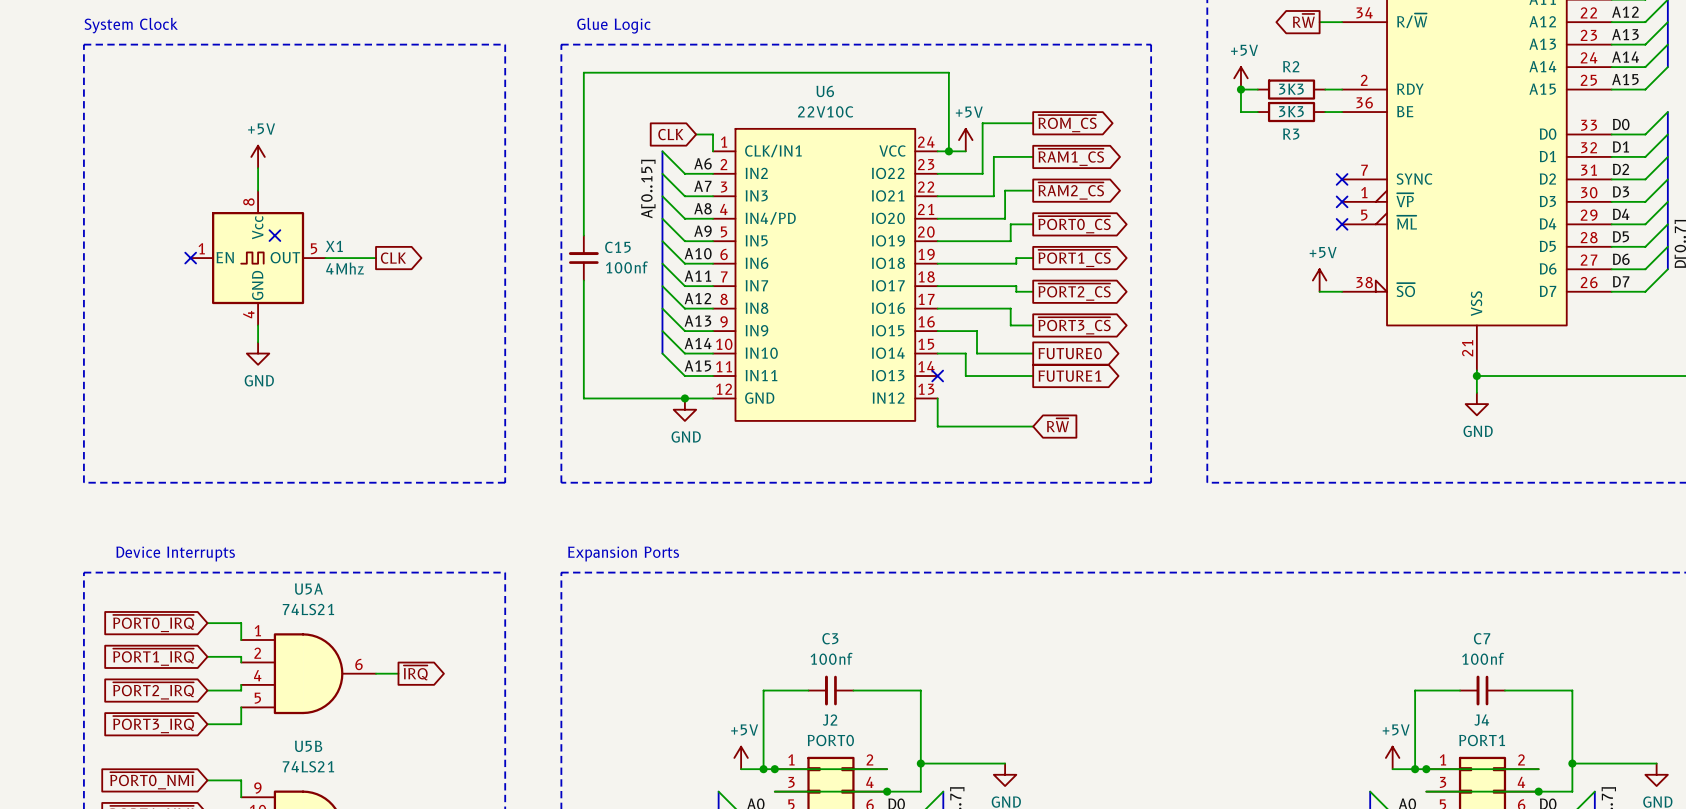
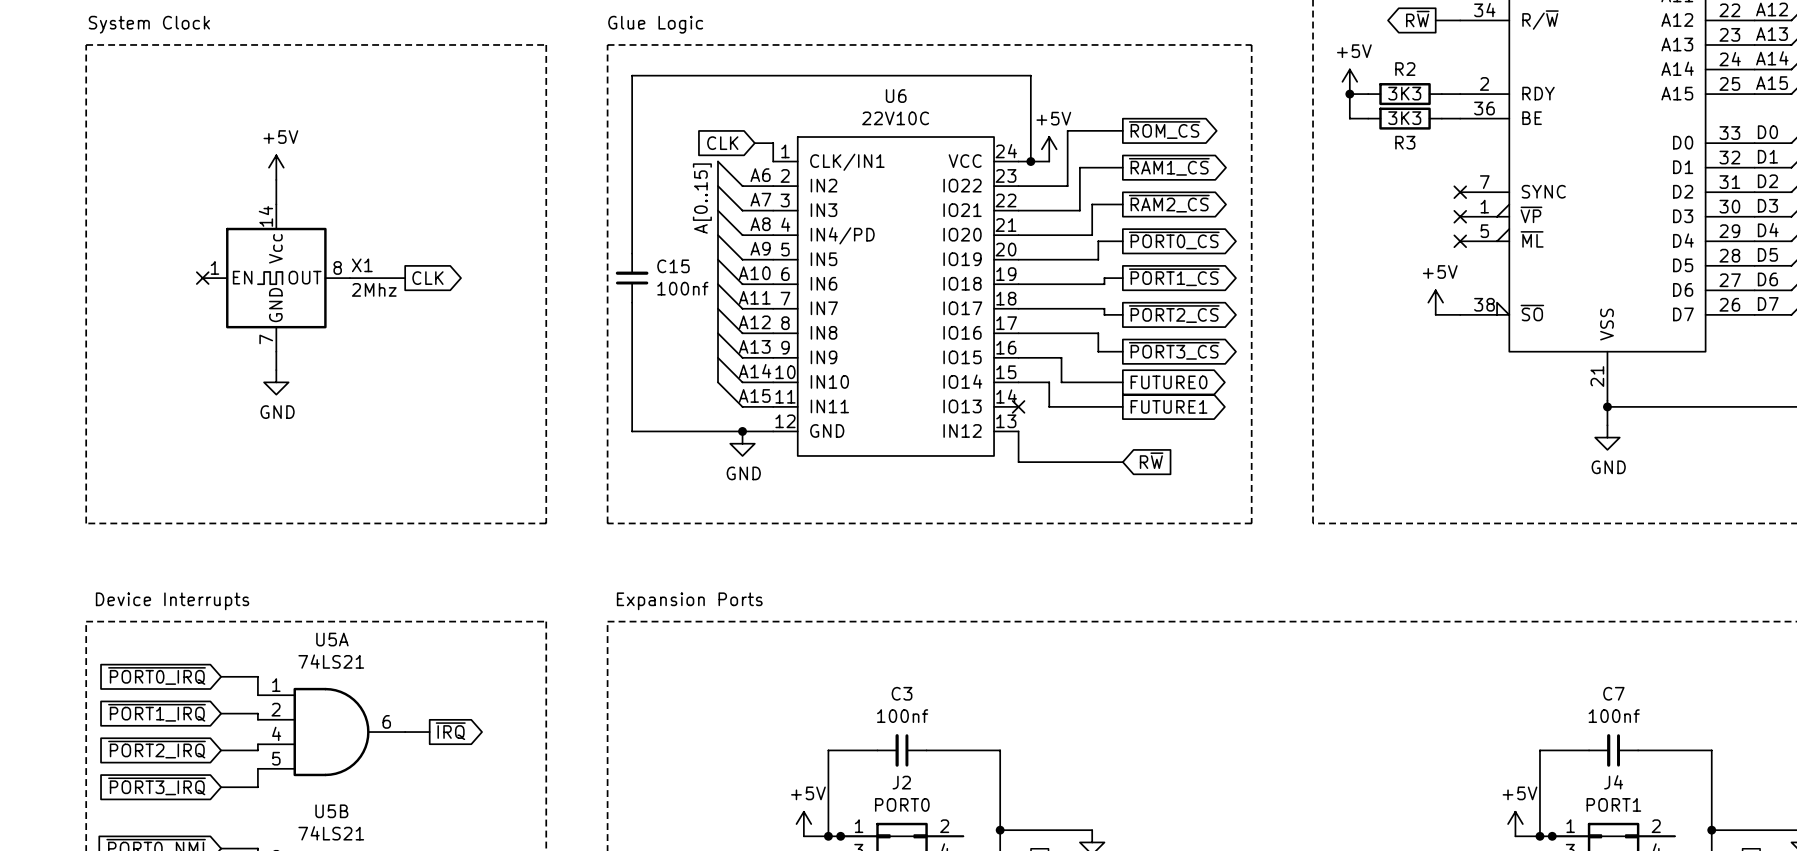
X1 pin number: 8 (248, 202) -> 14 (265, 216)
no-connect mark: (274, 235) -> none
X1 pin number: 5 (314, 248) -> 8 (337, 267)
X1 value: 4Mhz (345, 268) -> 2Mhz (374, 289)
X1 pin number: 4 (248, 314) -> 7 (266, 339)

